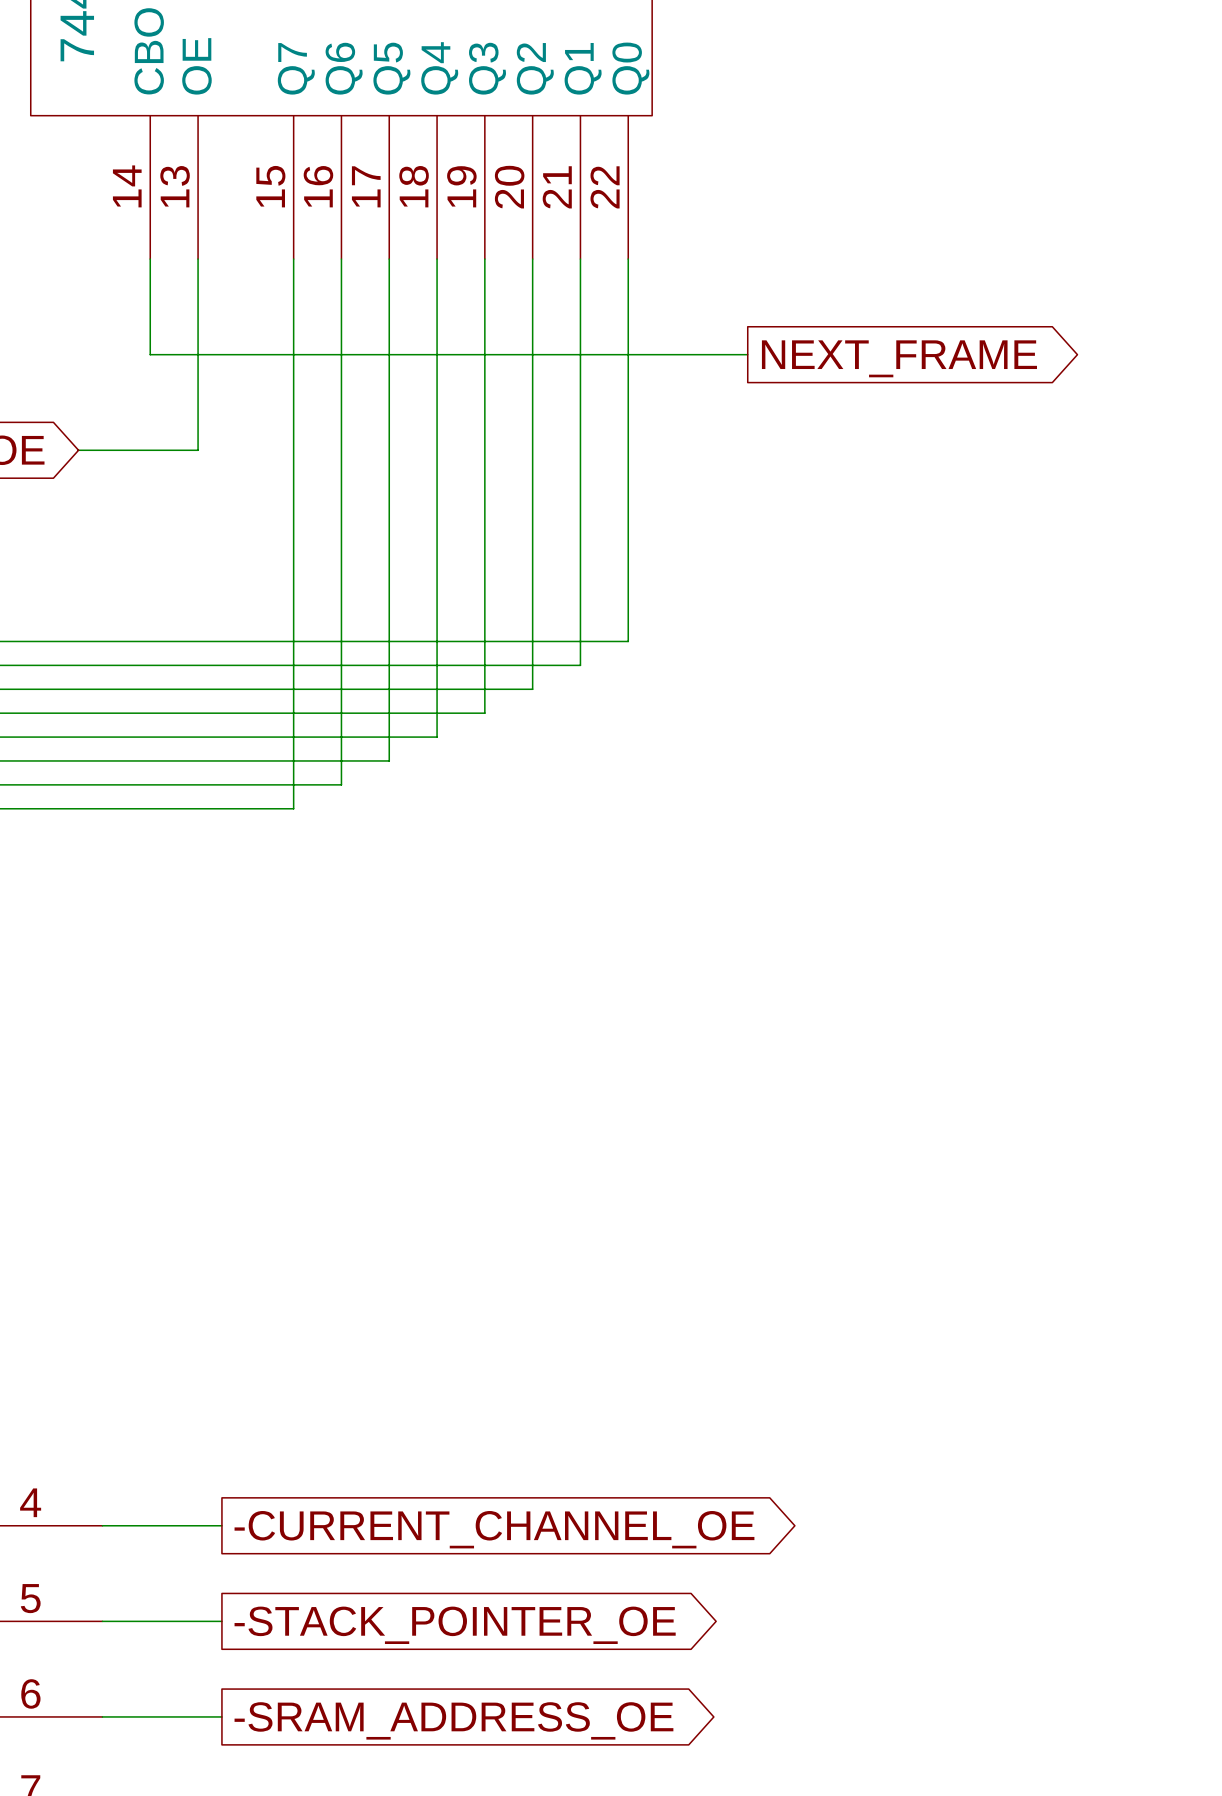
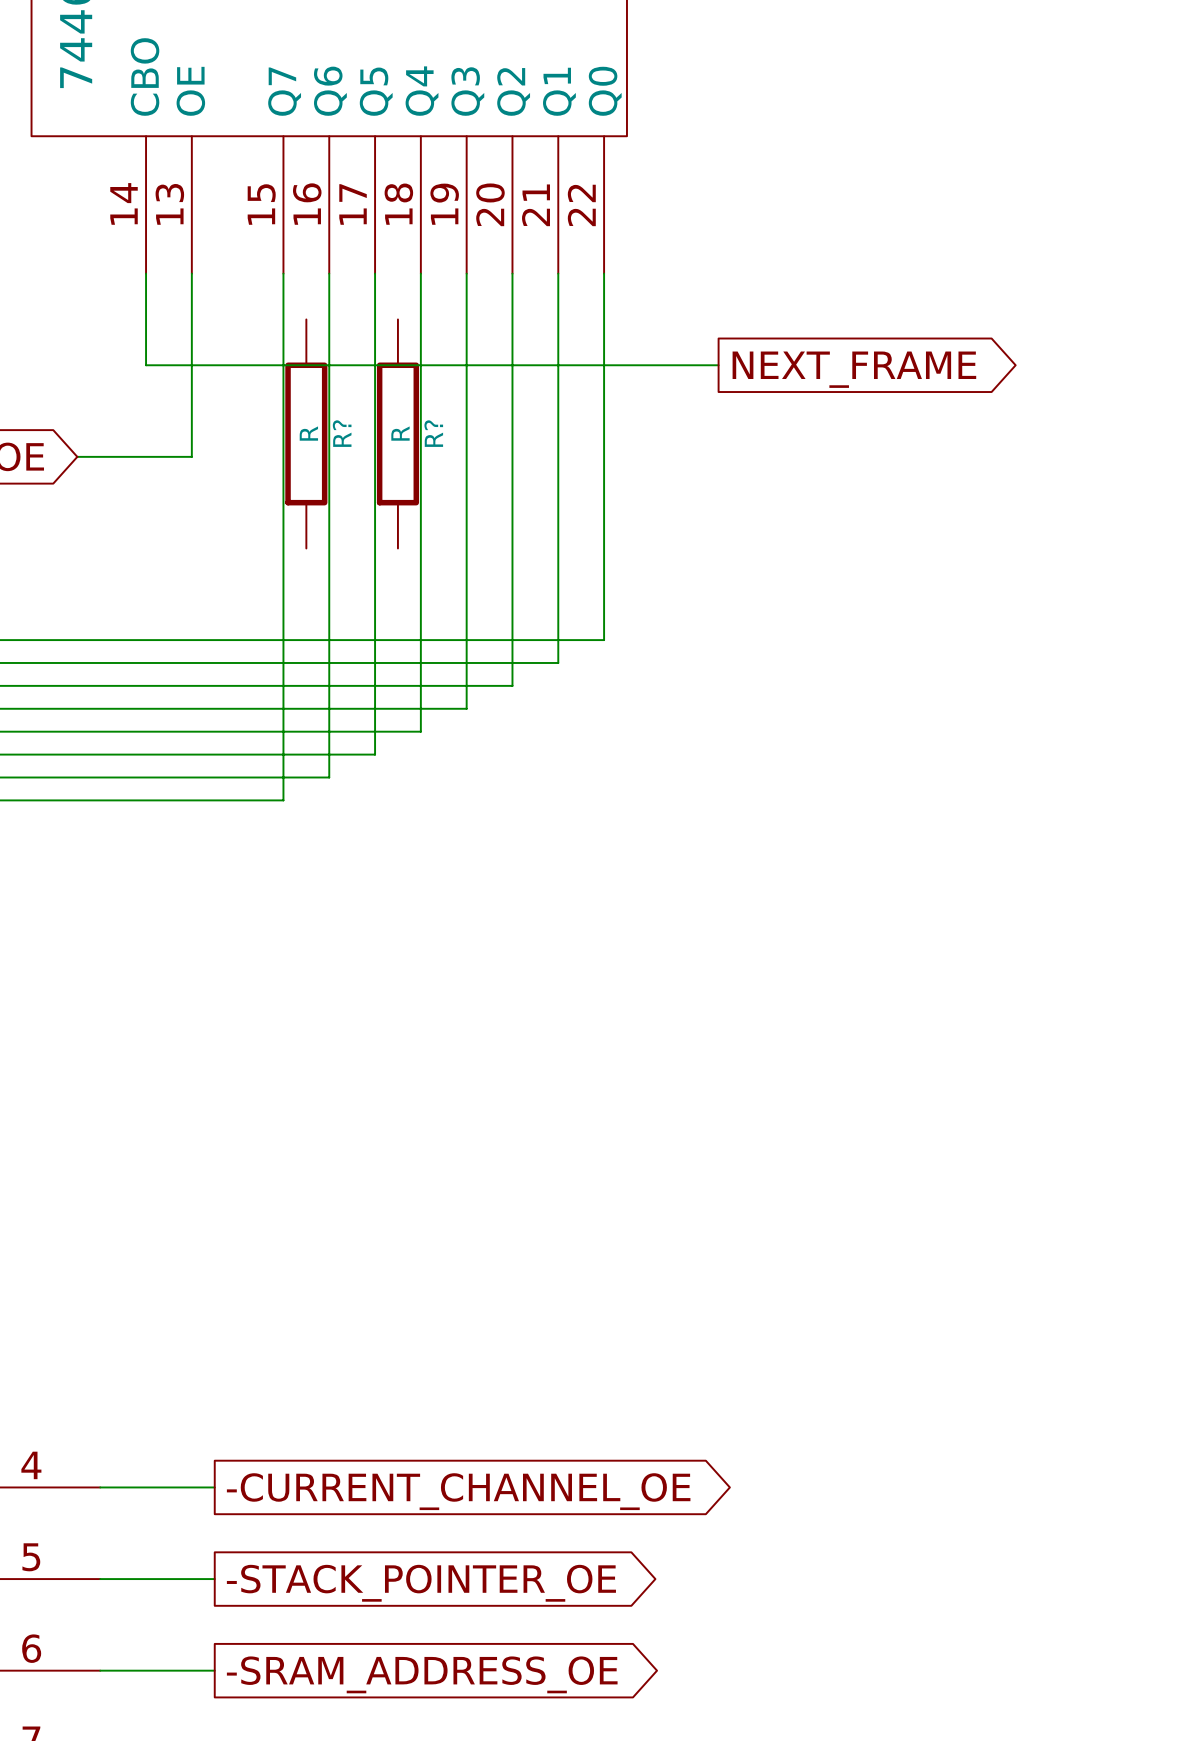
R?: none -> R (306, 433)
R?: none -> R (397, 433)

